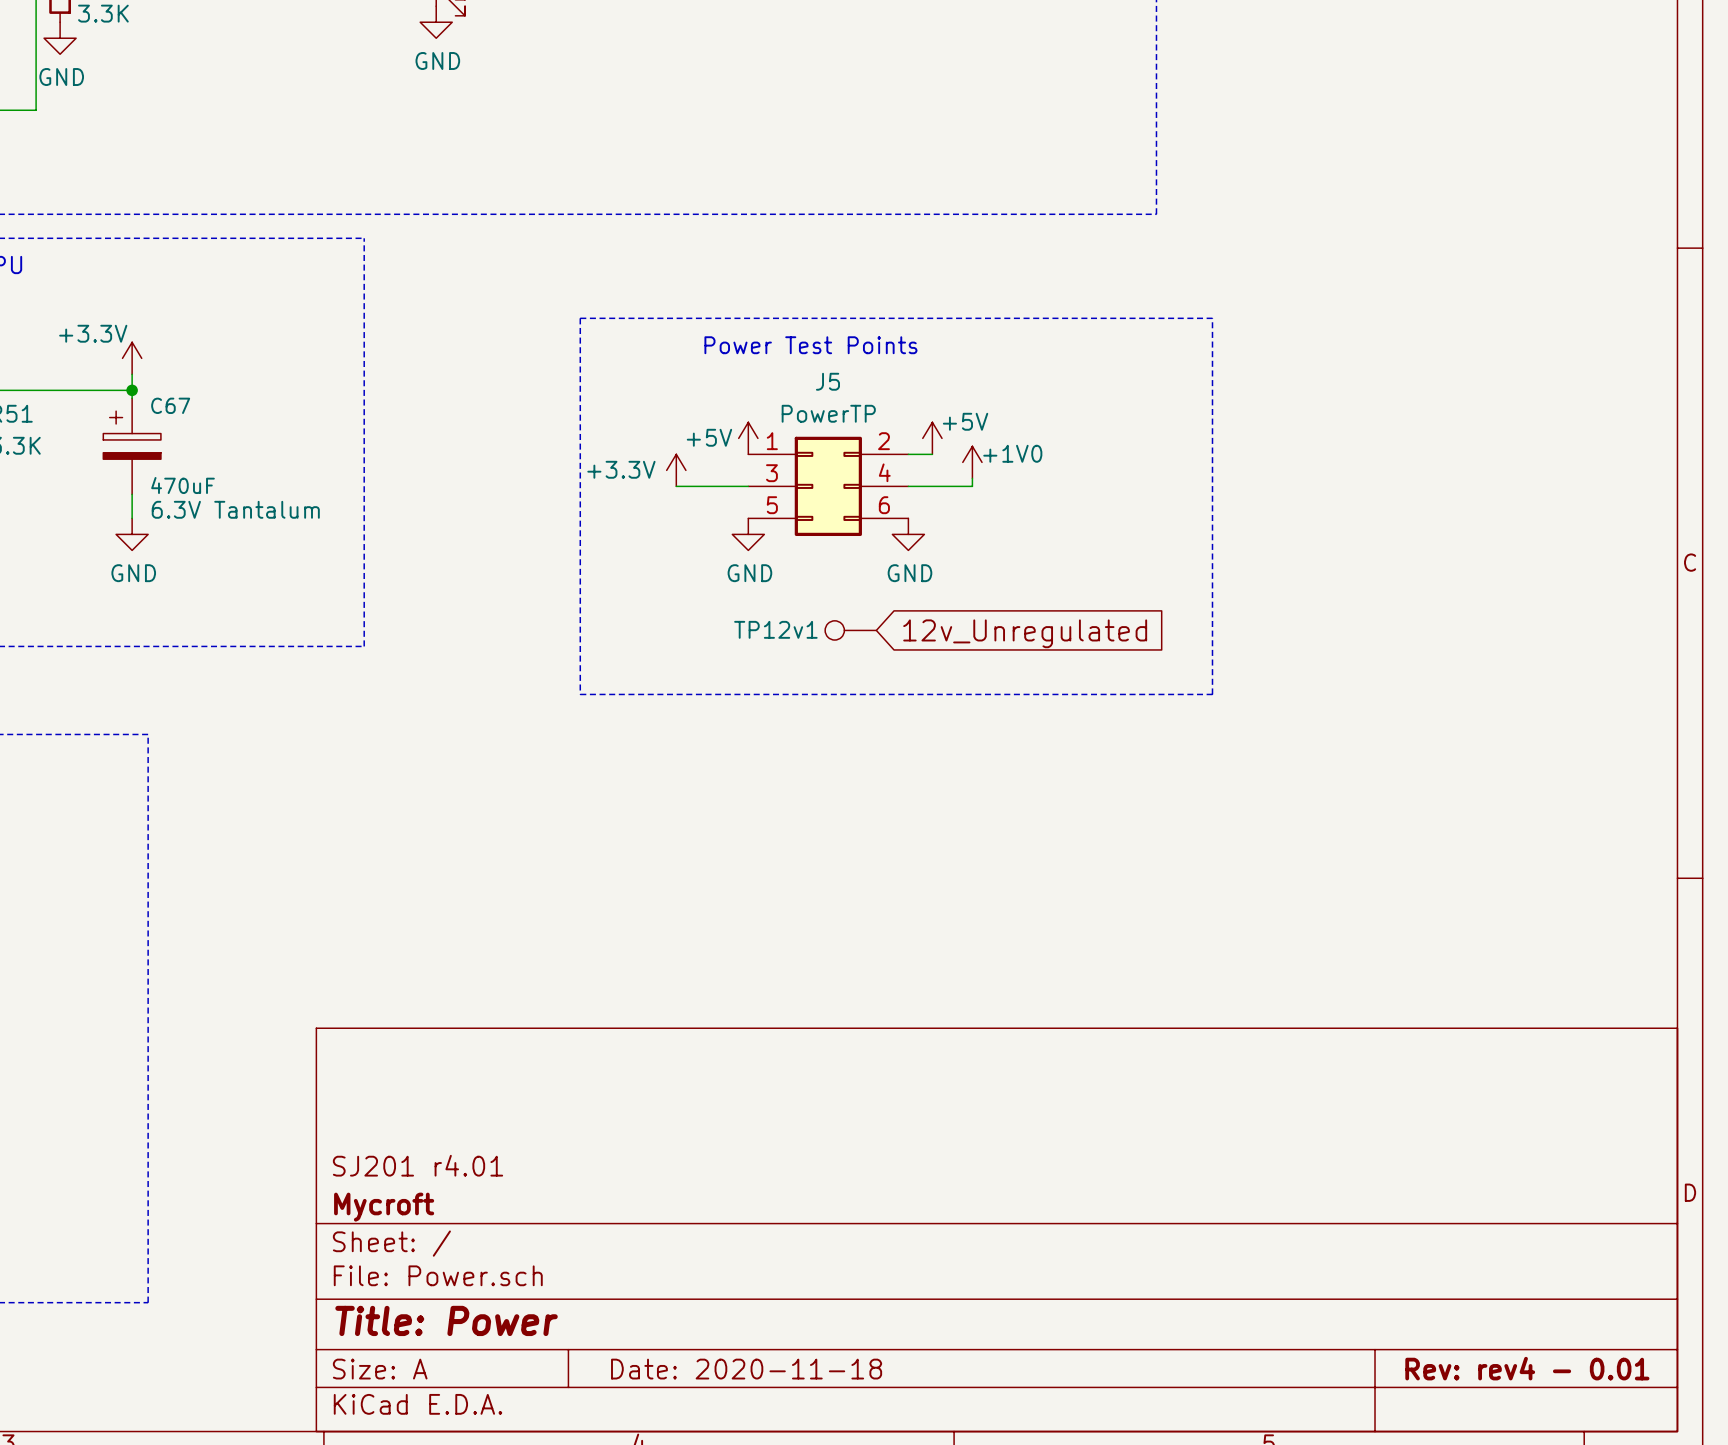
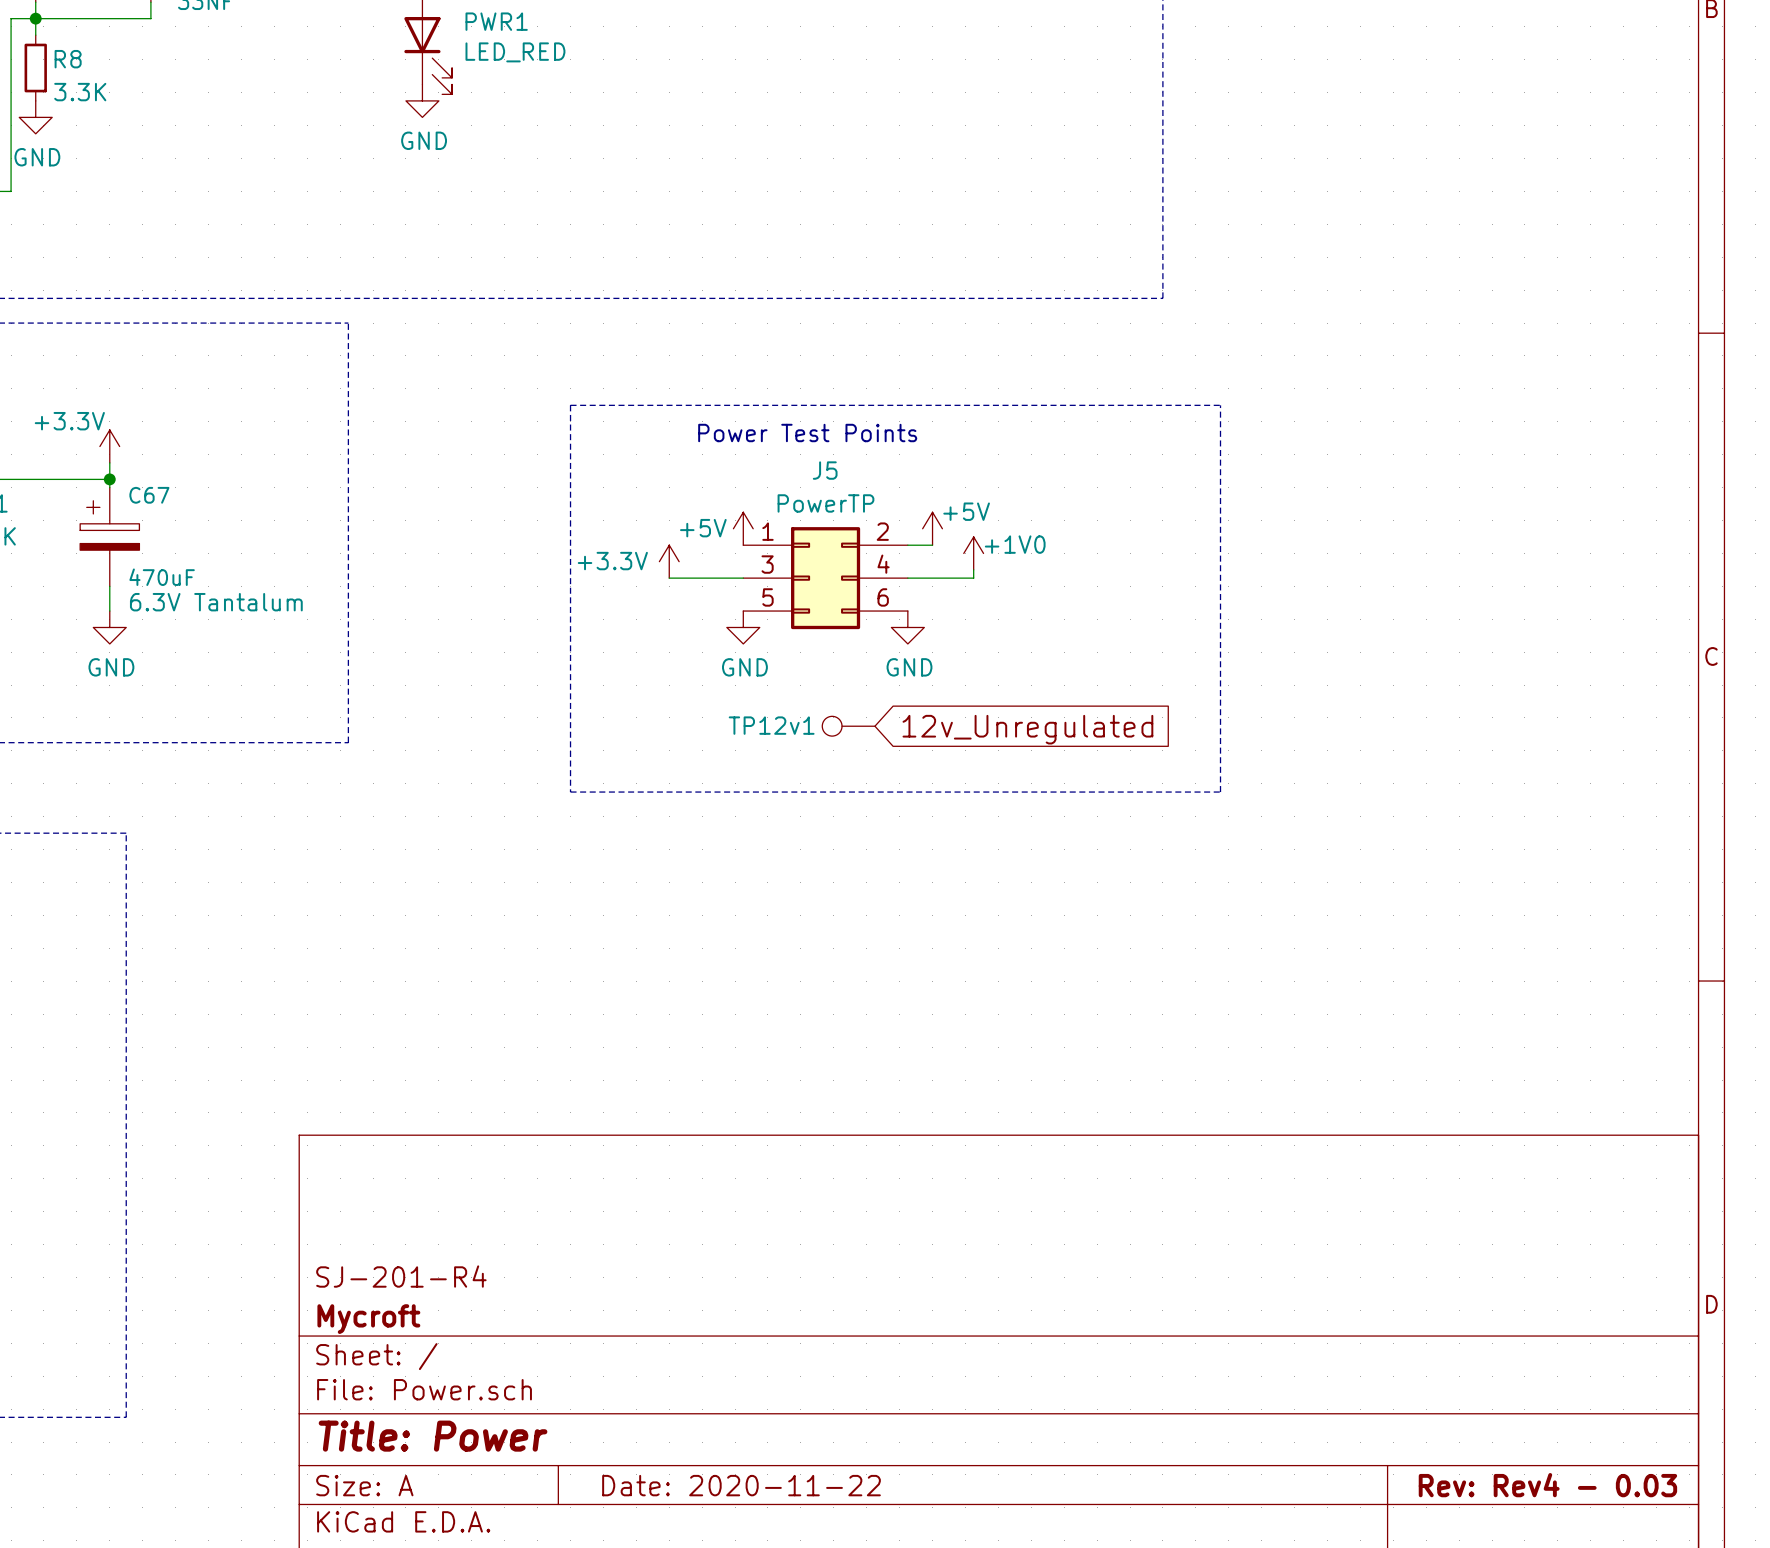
title block: SJ201 r4.01 (418, 1165) -> SJ-201-R4 (401, 1276)
title block: Rev: rev4 - 0.01 (1527, 1368) -> Rev: Rev4 - 0.03 (1547, 1485)
title block: Date: 2020-11-18 (746, 1369) -> Date: 2020-11-22 (741, 1485)

